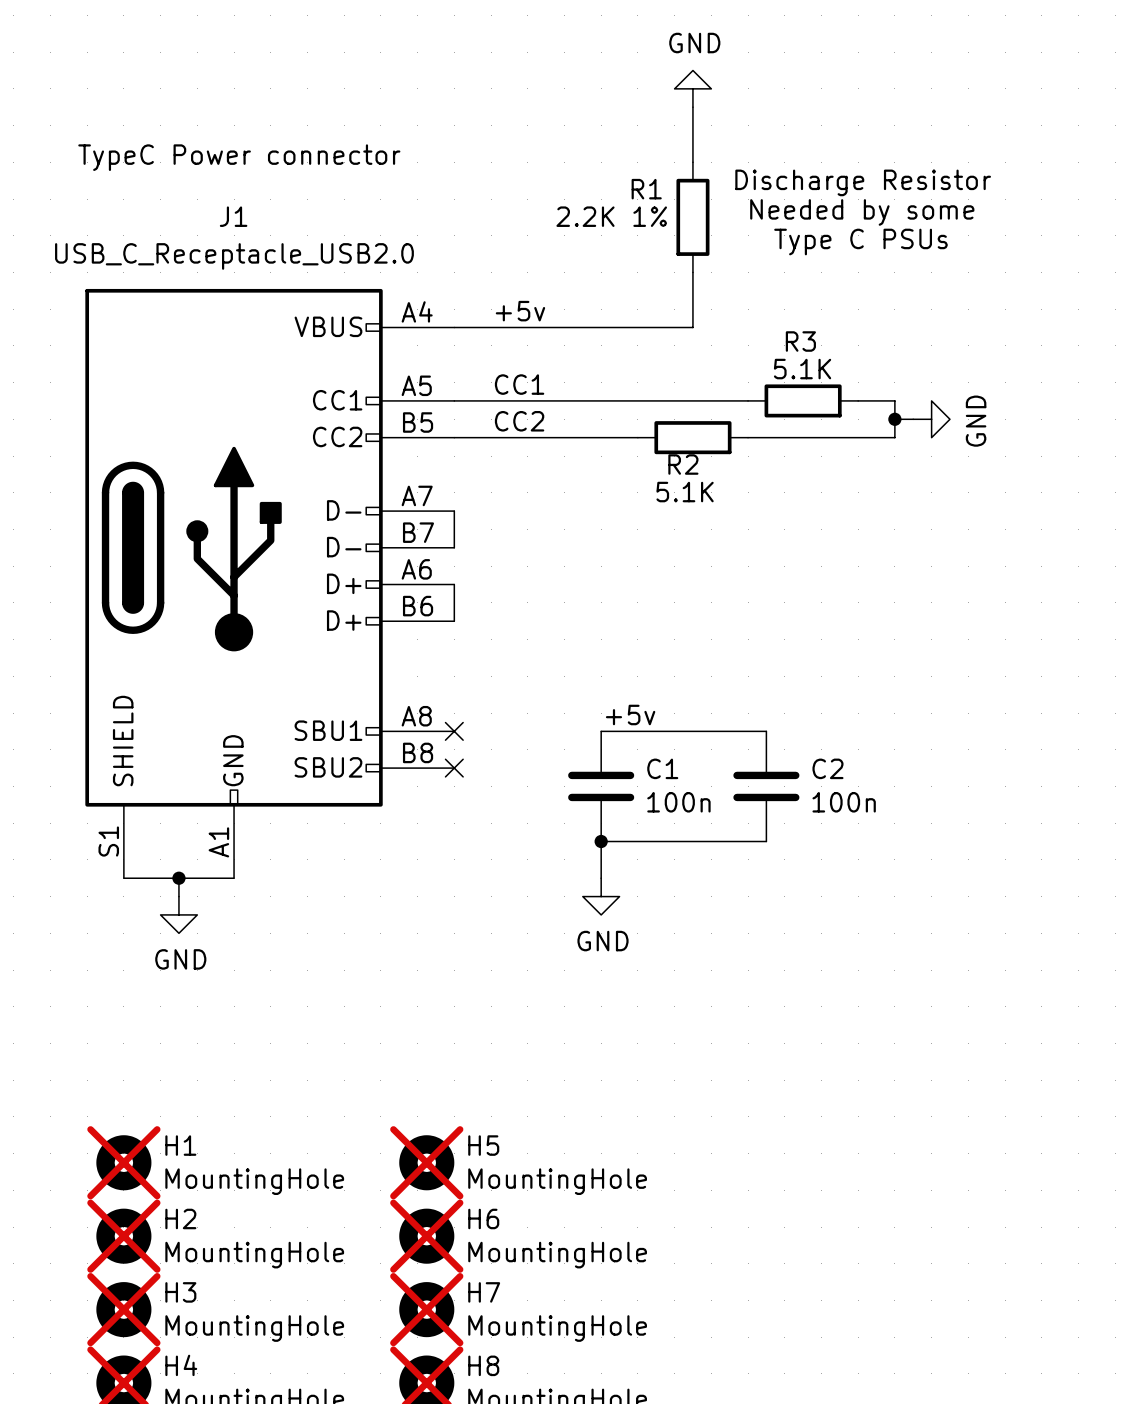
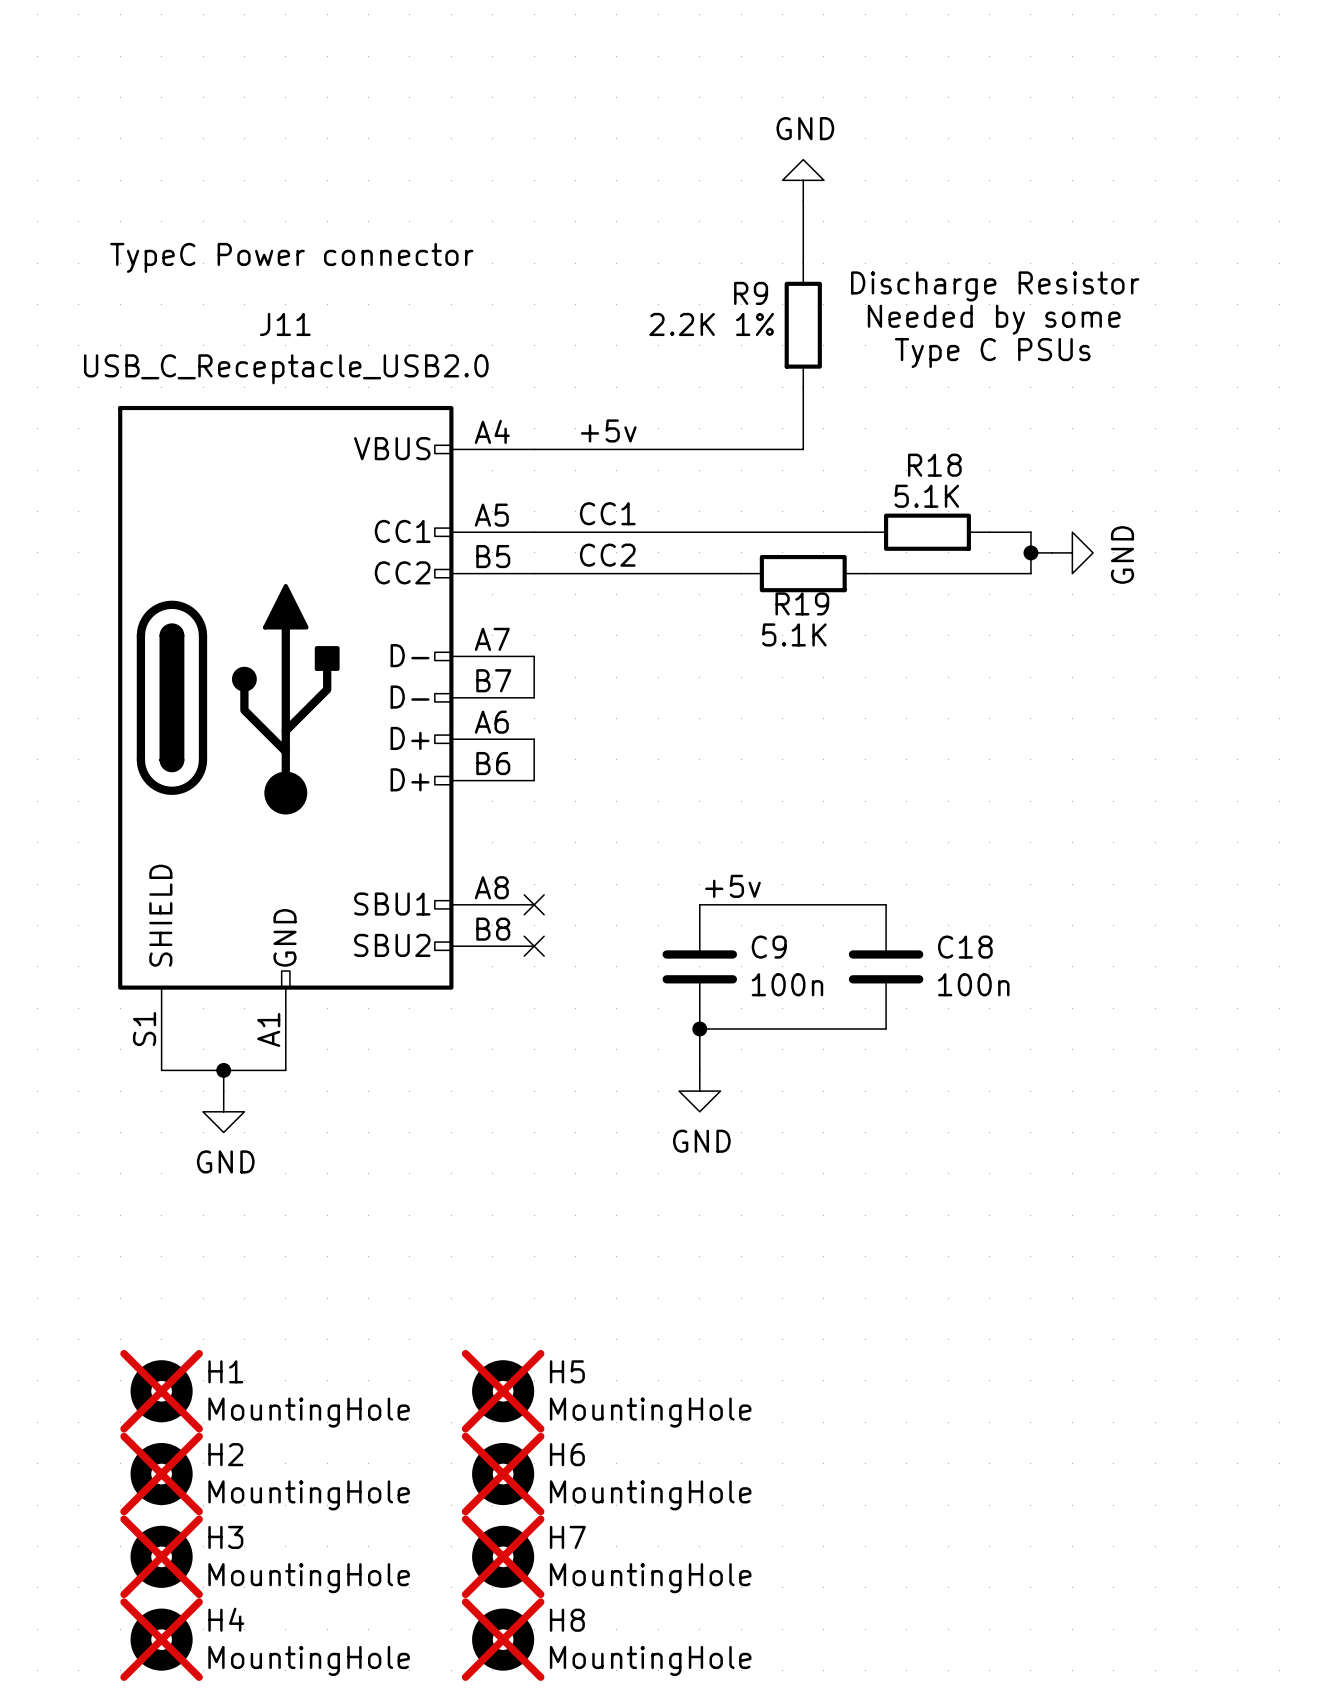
R1 name: R1 (646, 189) -> R9 (751, 293)
J1 name: J1 (233, 216) -> J11 (285, 324)
R3 name: R3 (800, 341) -> R18 (934, 465)
R2 name: R2 (683, 464) -> R19 (802, 603)
C1 name: C1 (662, 768) -> C9 (769, 947)
C2 name: C2 (827, 768) -> C18 (965, 947)

